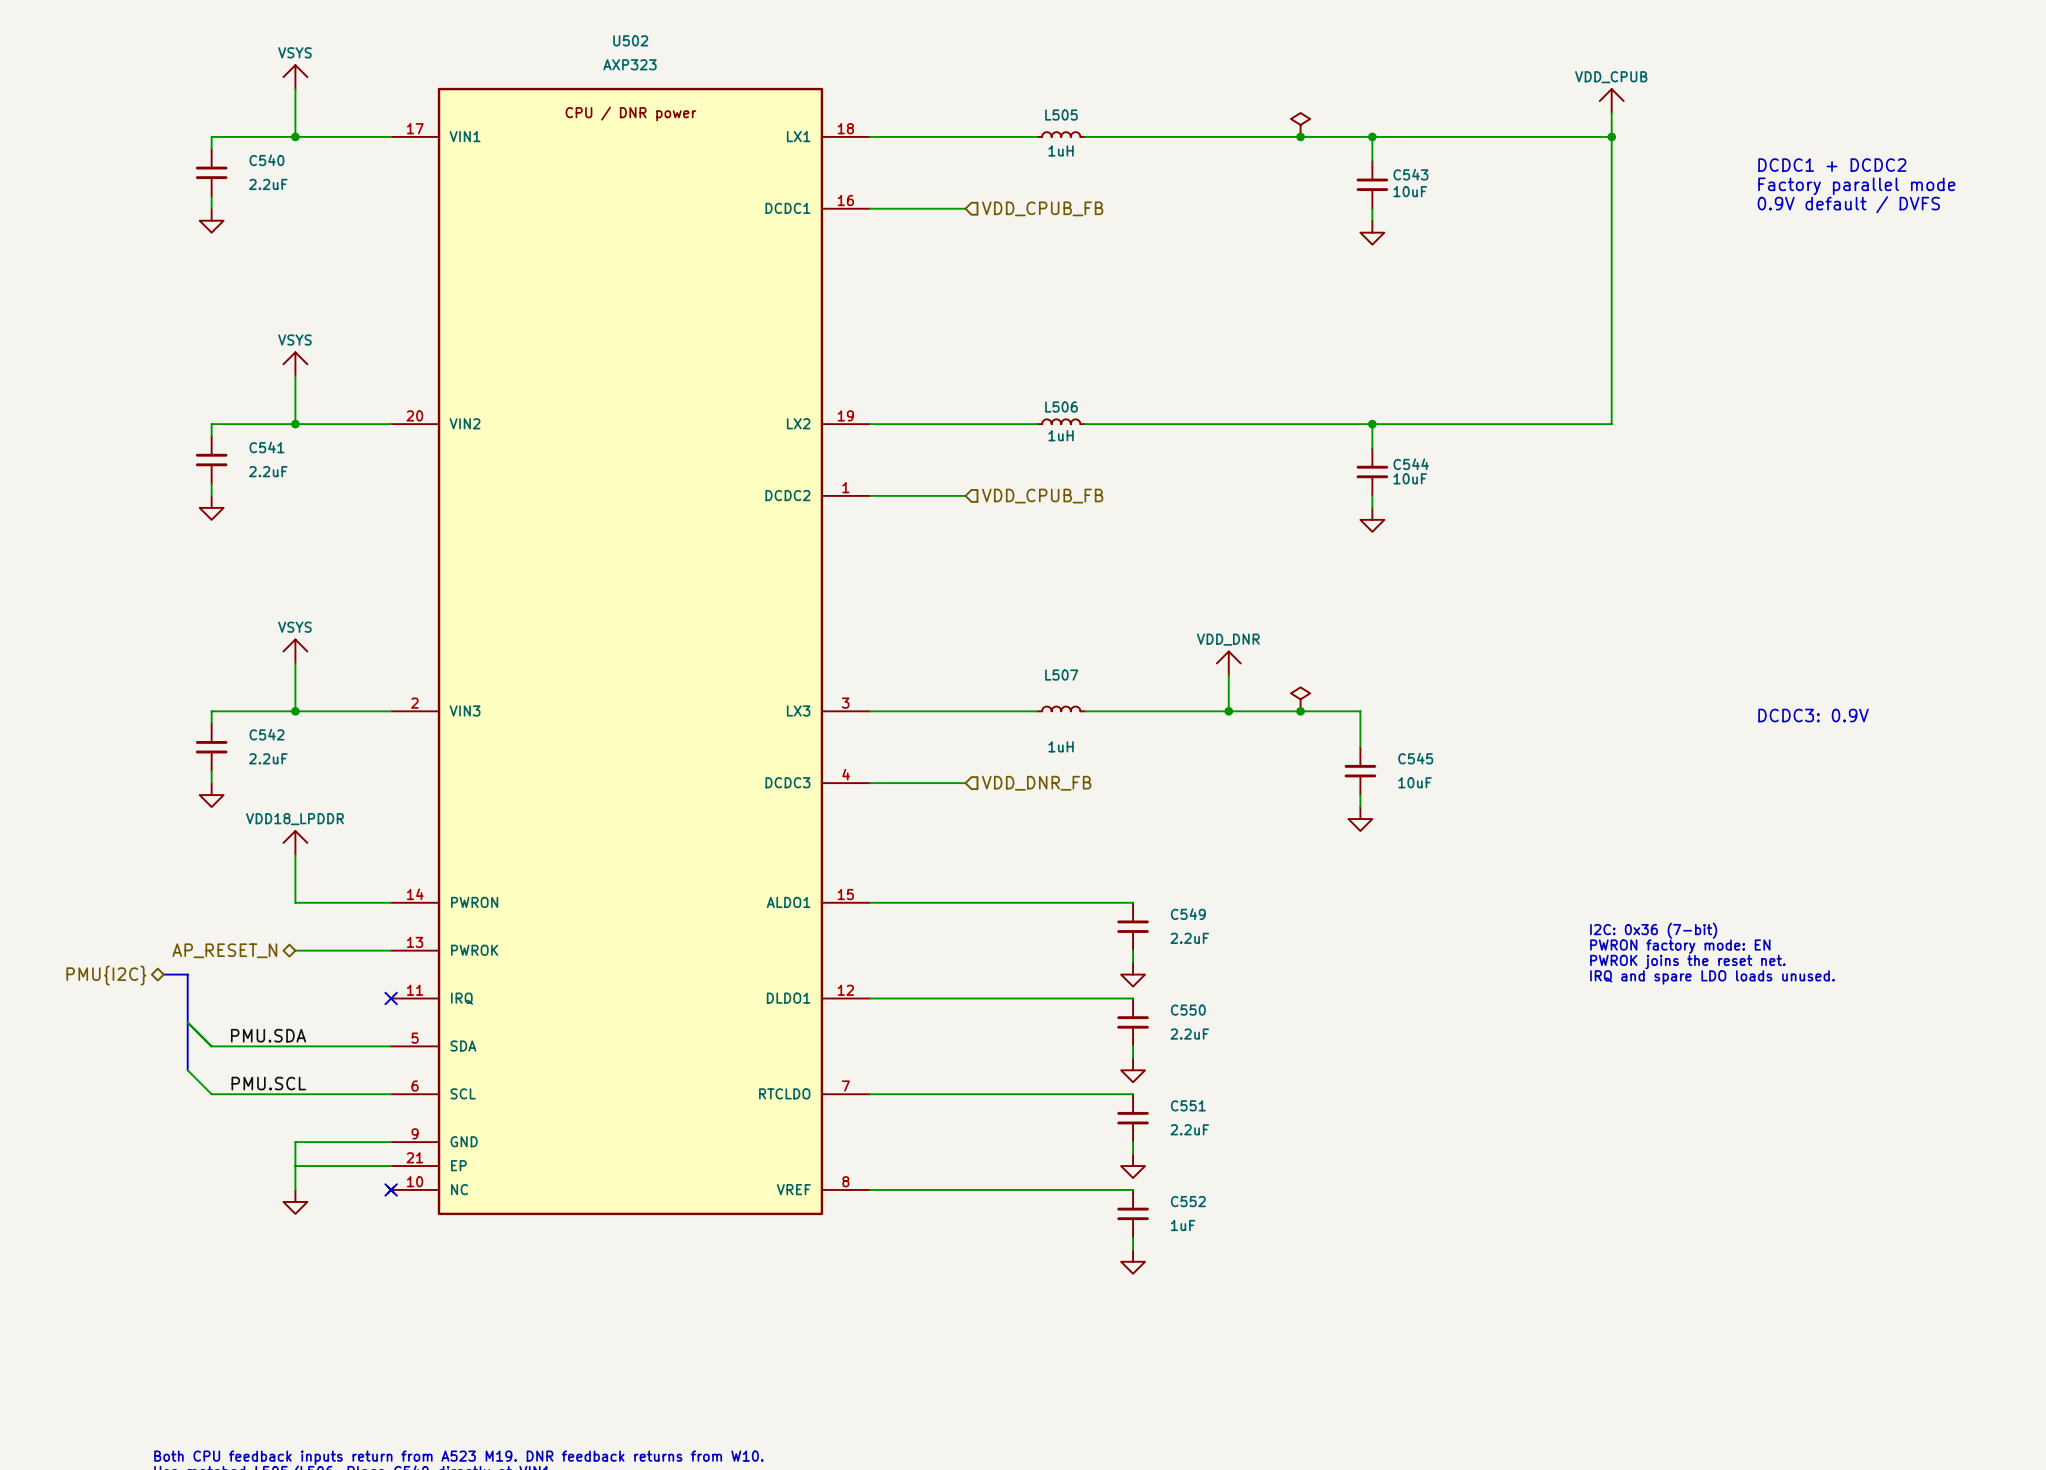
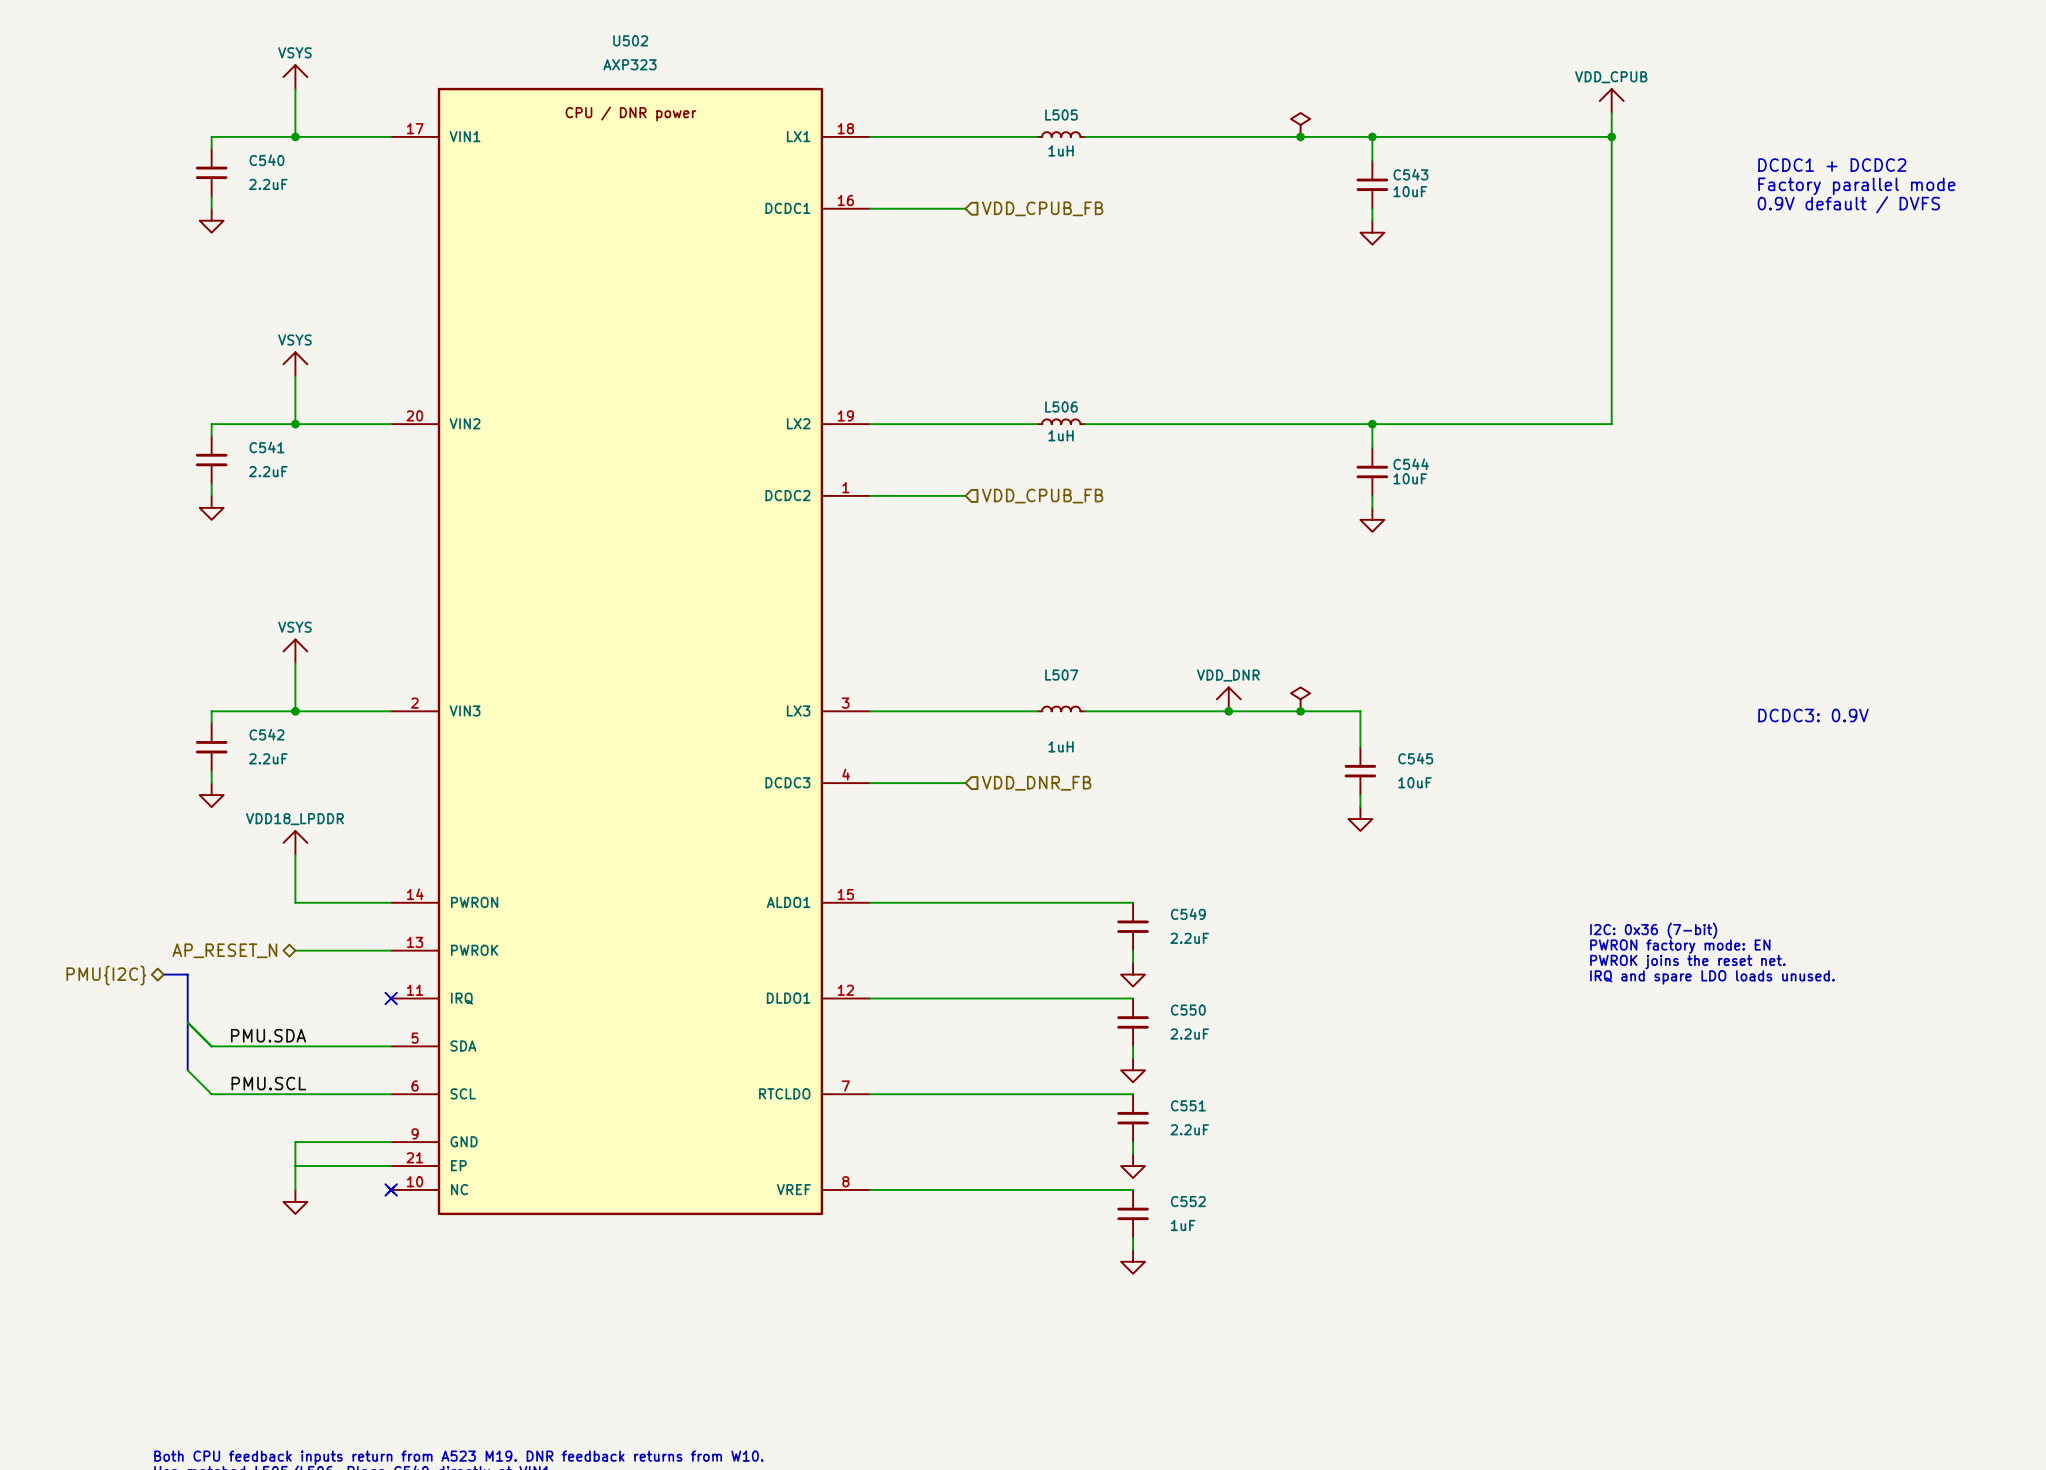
power symbol position: VDD_DNR (1228, 663) -> VDD_DNR (1228, 699)

